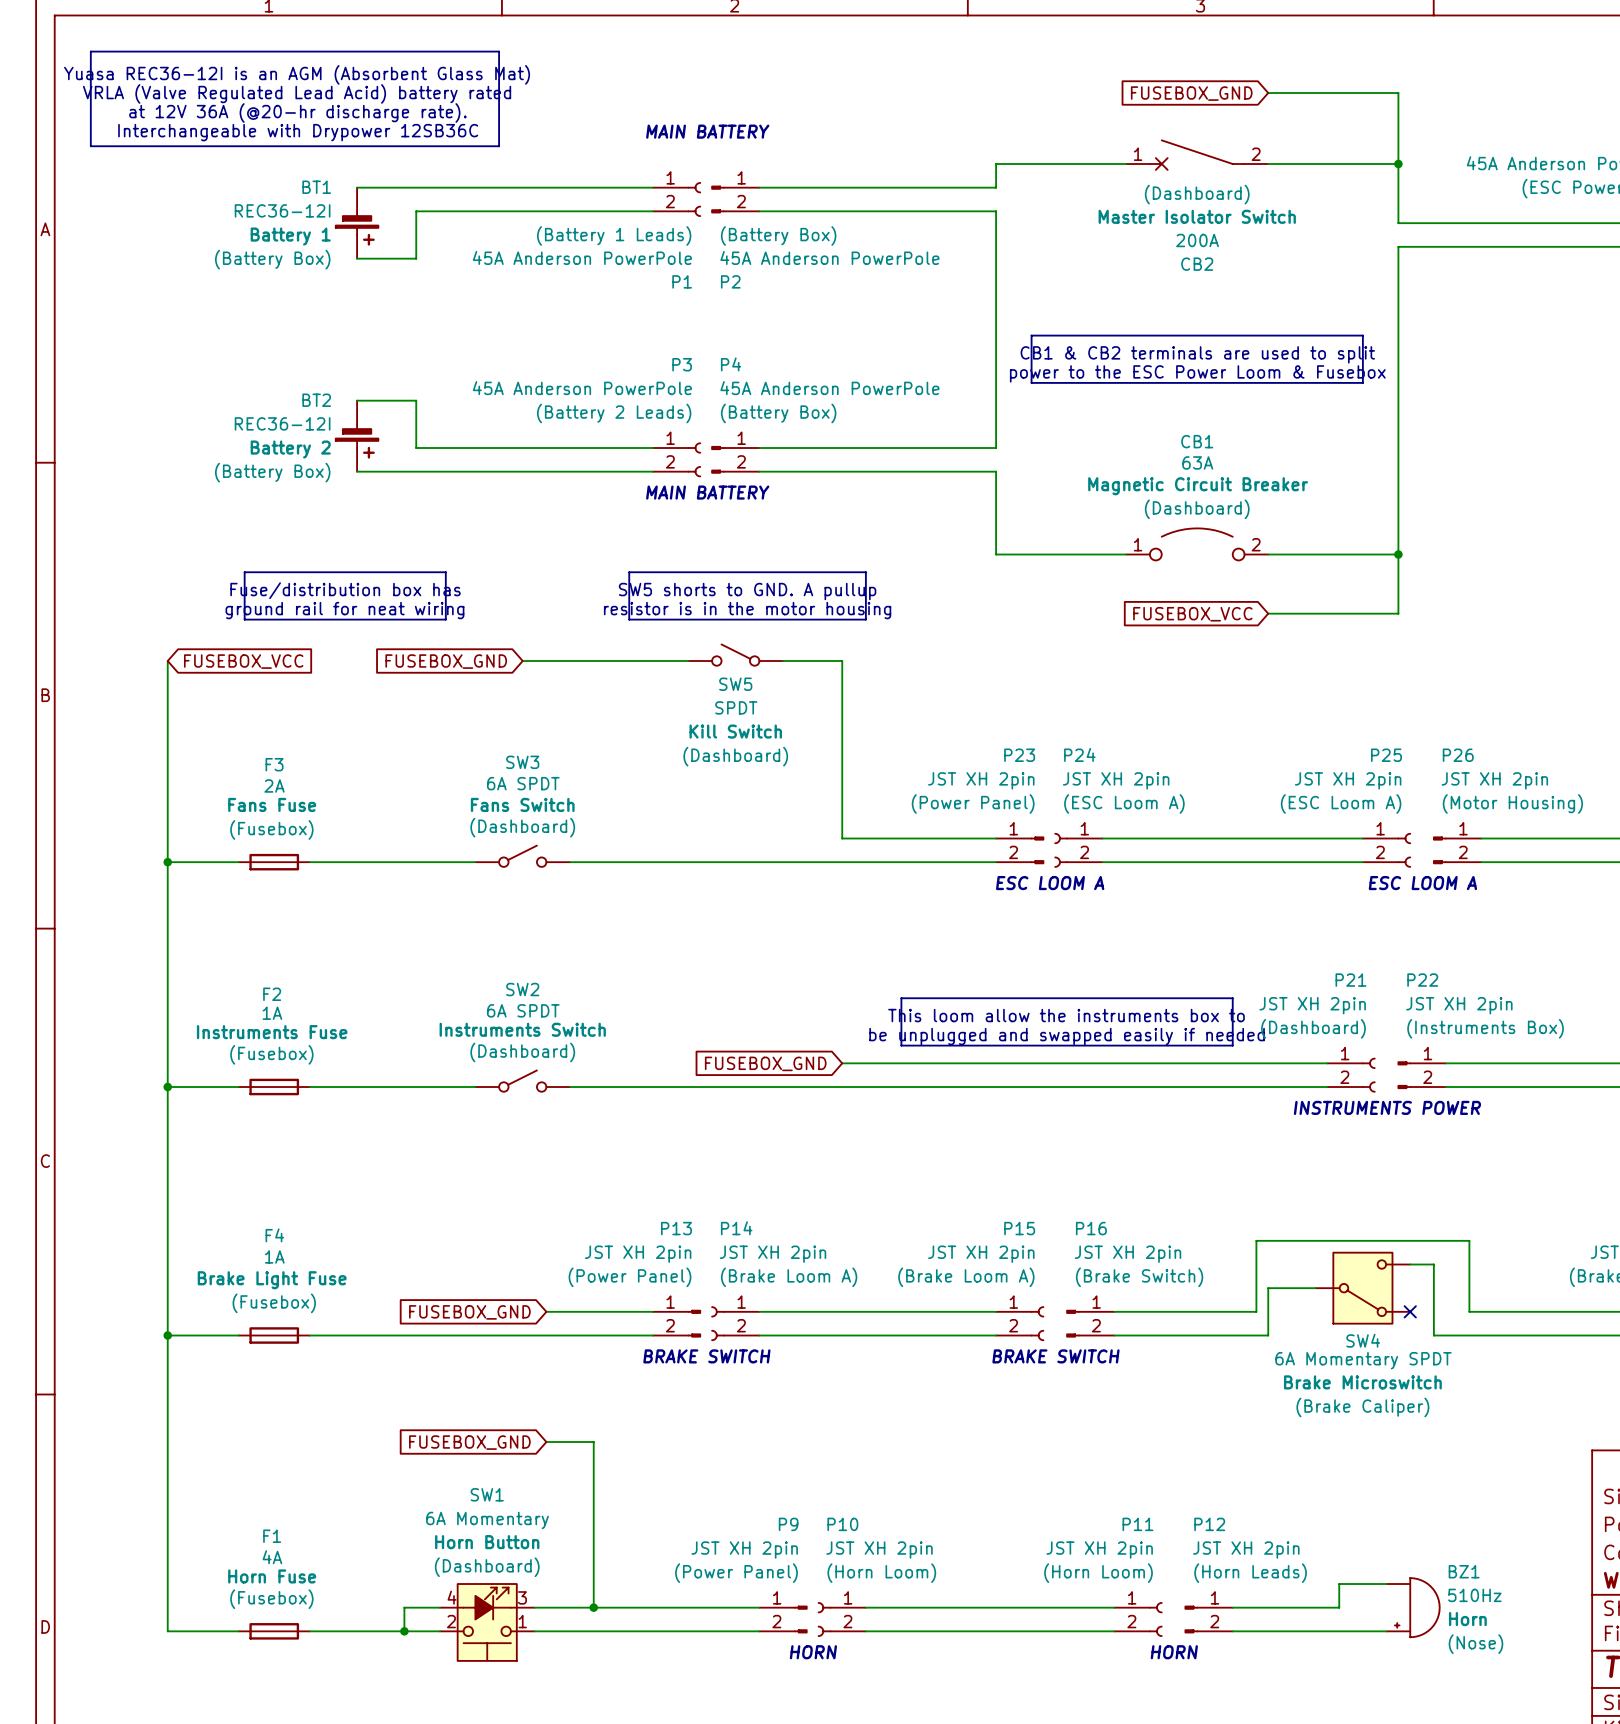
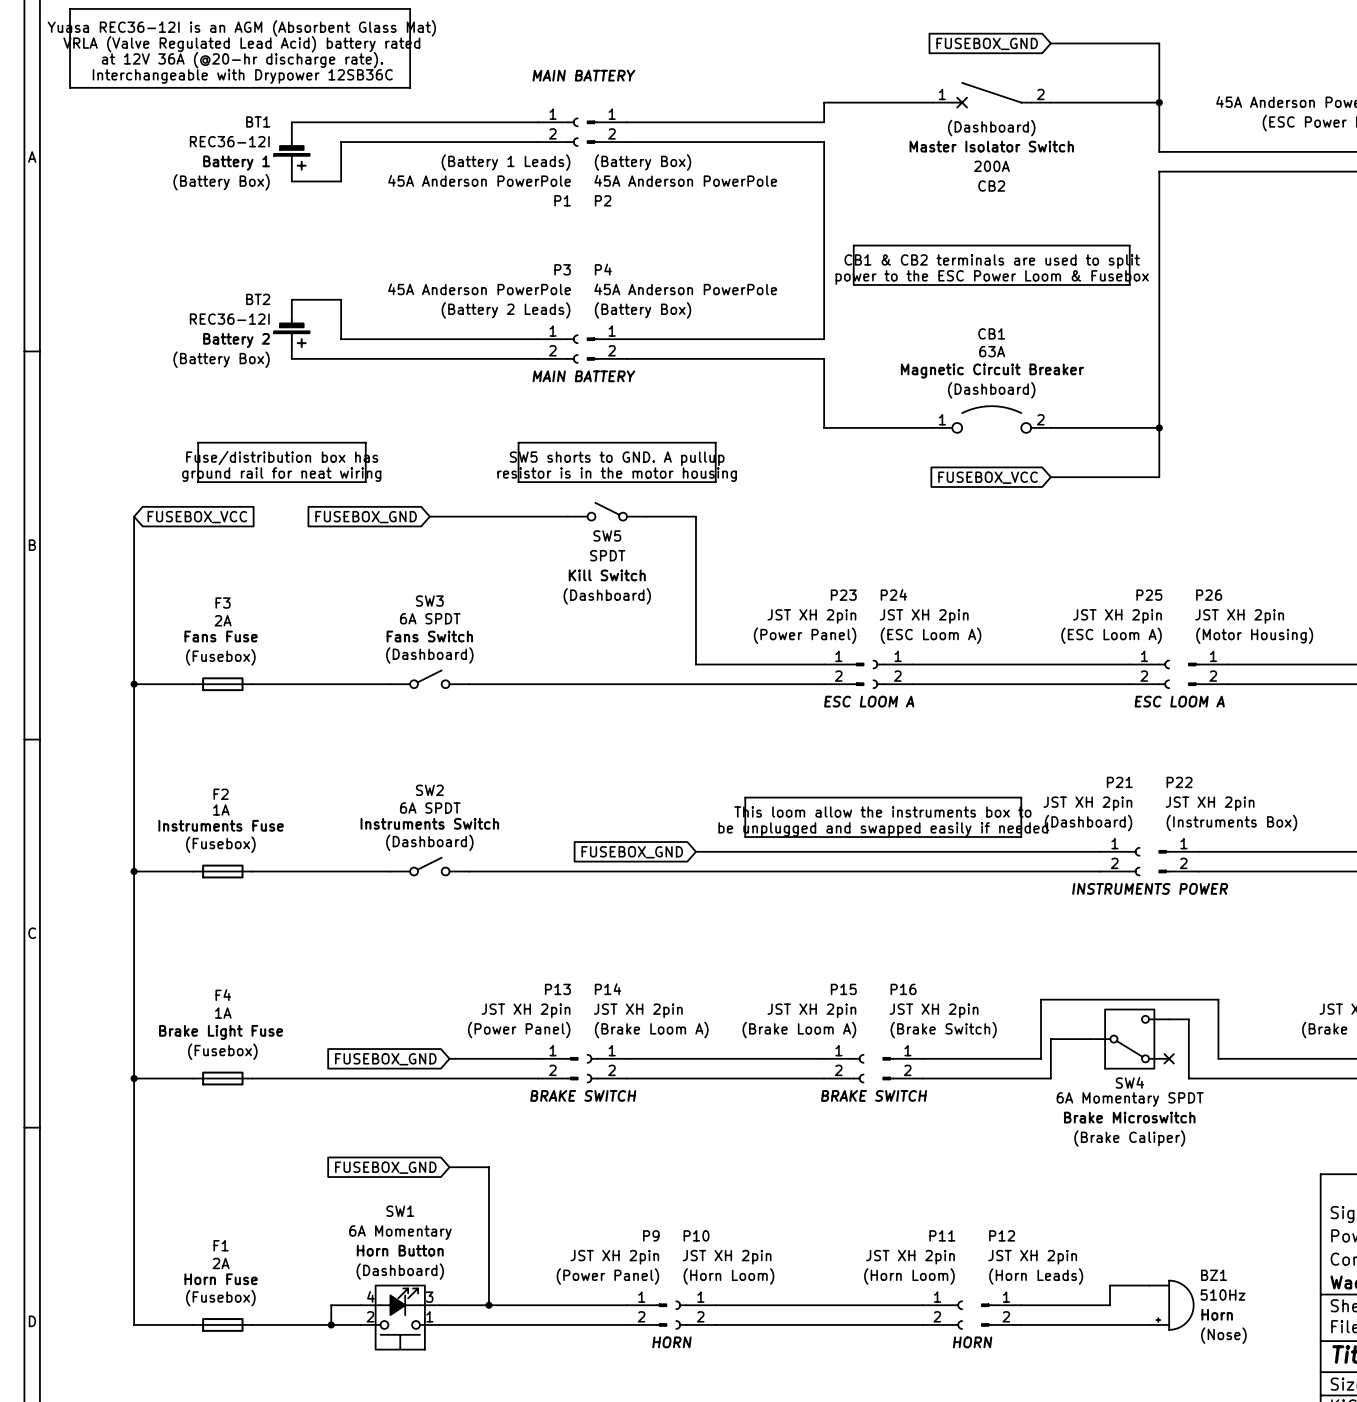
F1 value: 4A (272, 1557) -> 2A (221, 1263)

